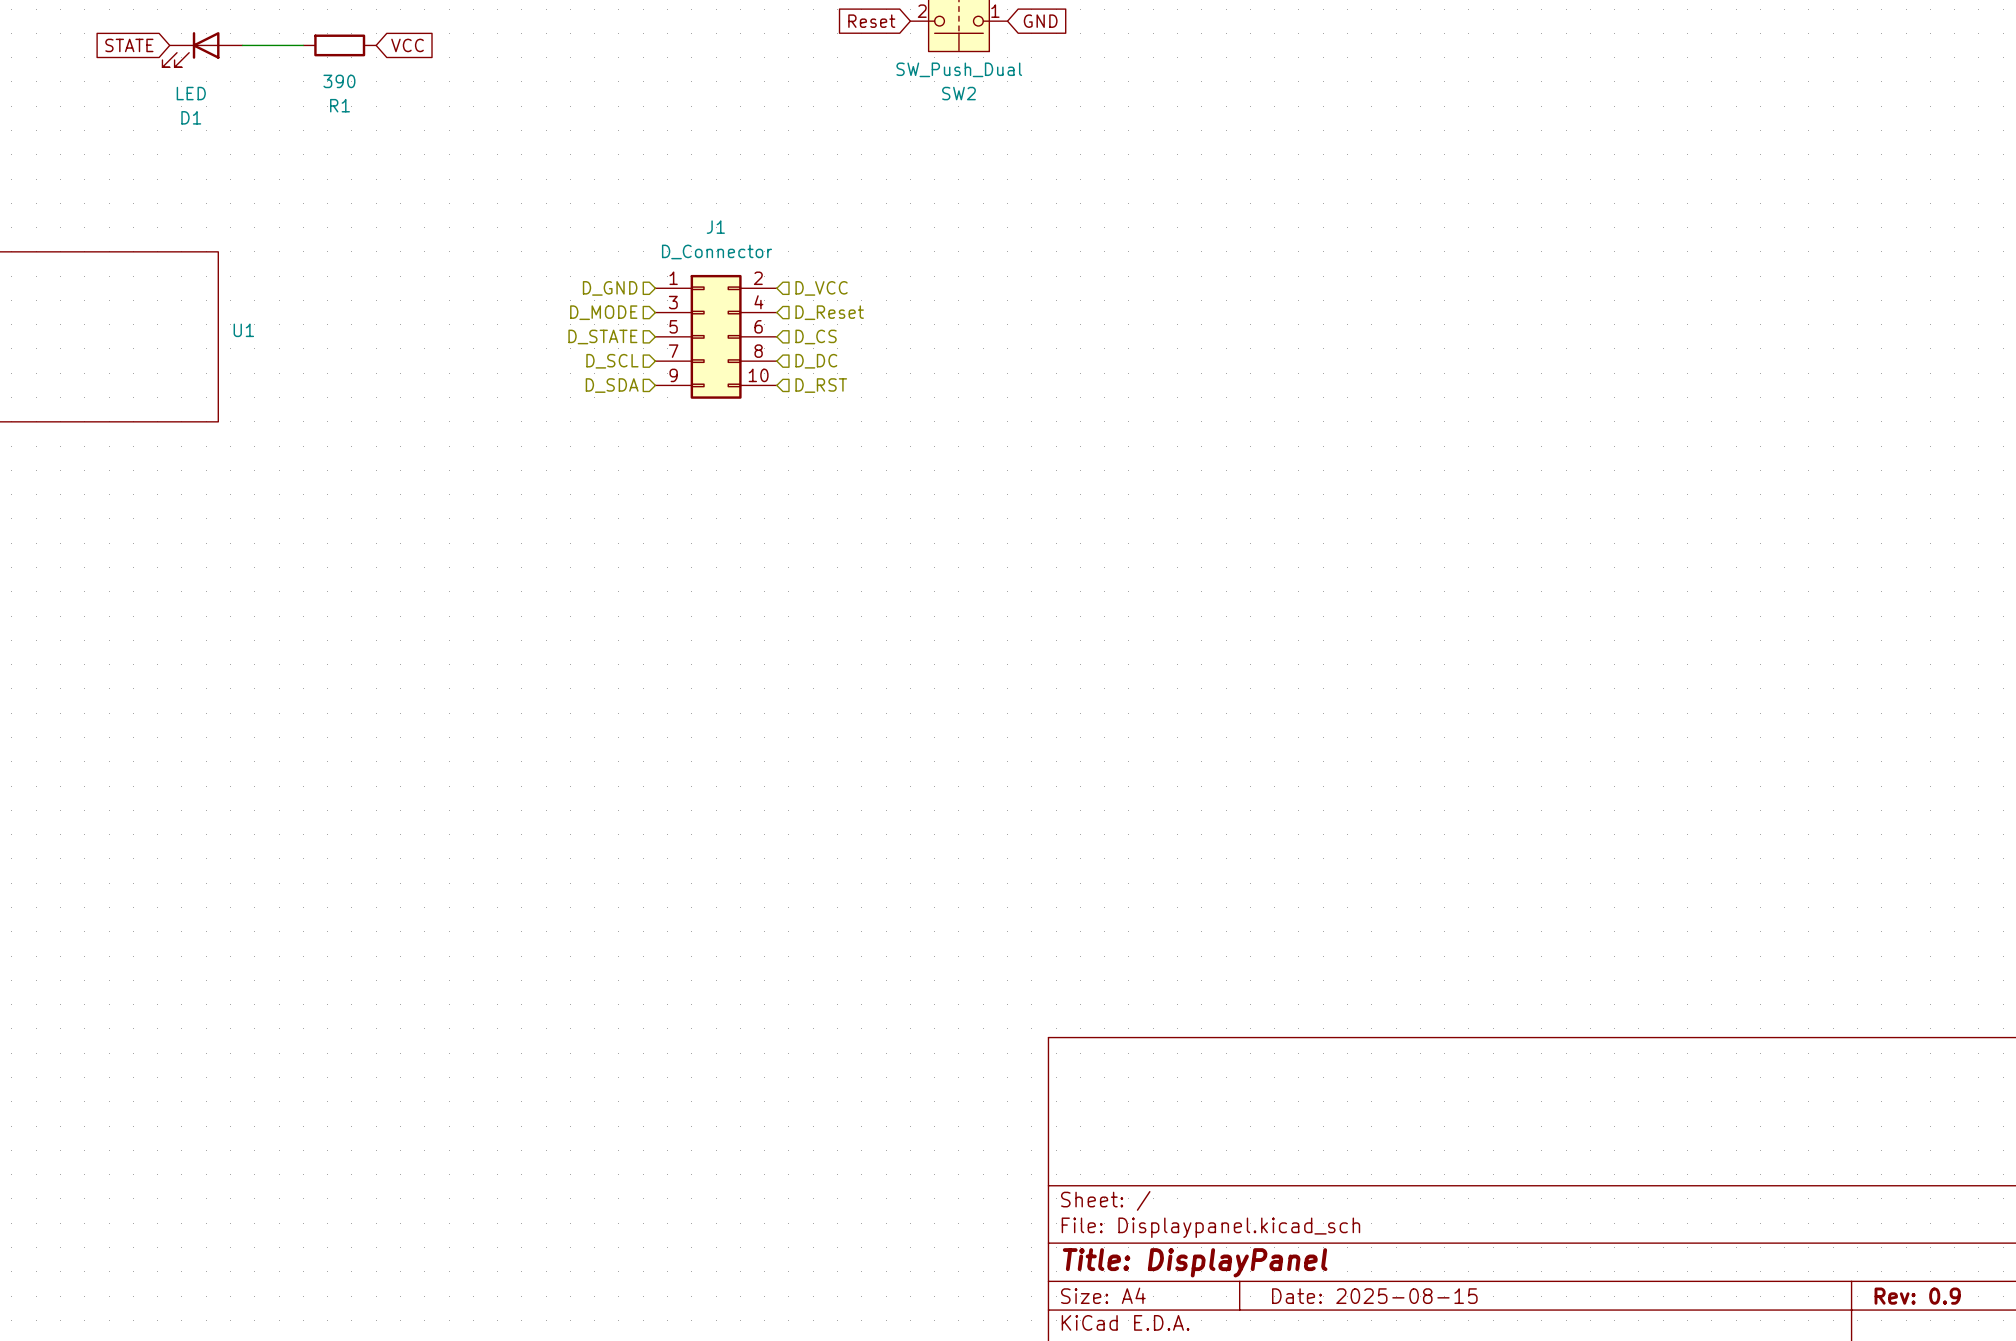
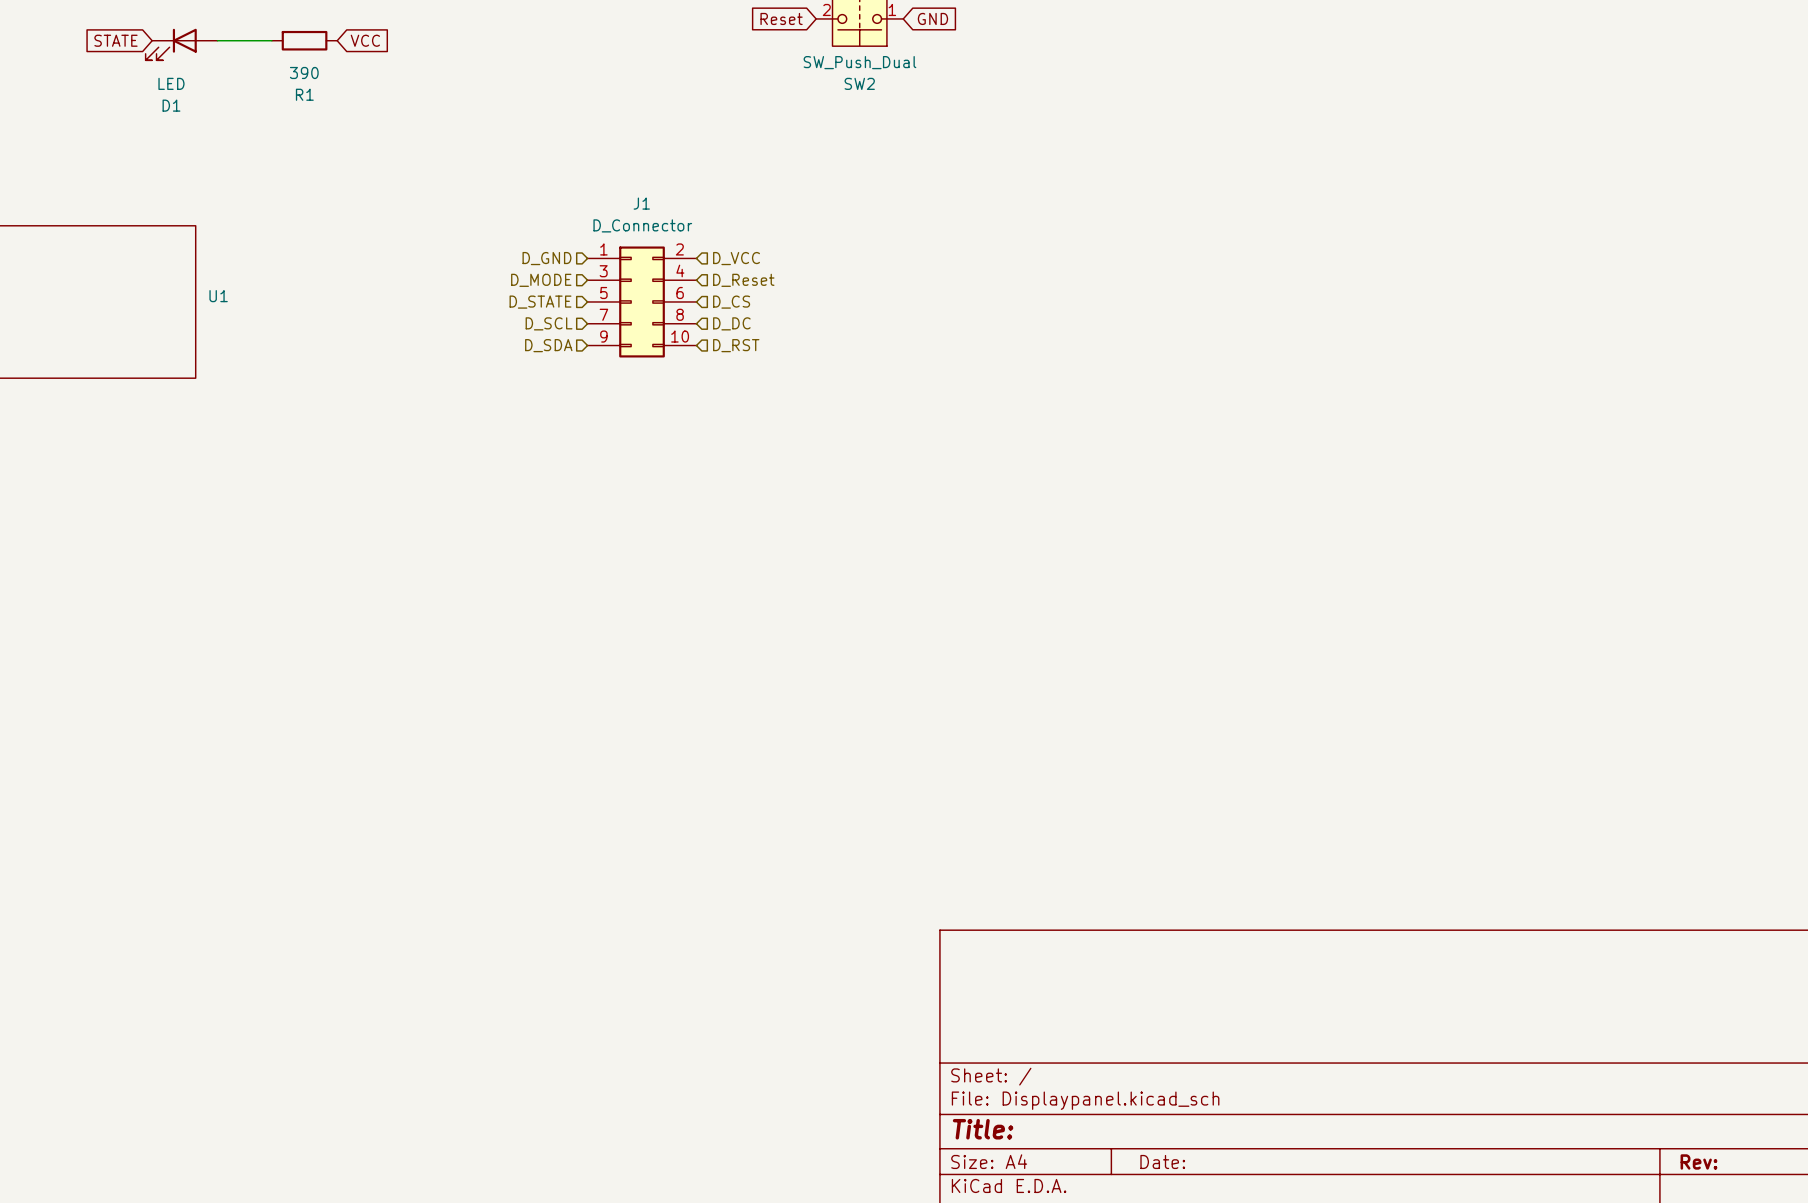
title block: Title: DisplayPanel (1195, 1262) -> Title: (983, 1129)
title block: Date: 2025-08-15 (1374, 1296) -> Date: (1162, 1161)
title block: Rev: 0.9 (1917, 1296) -> Rev: (1698, 1161)

